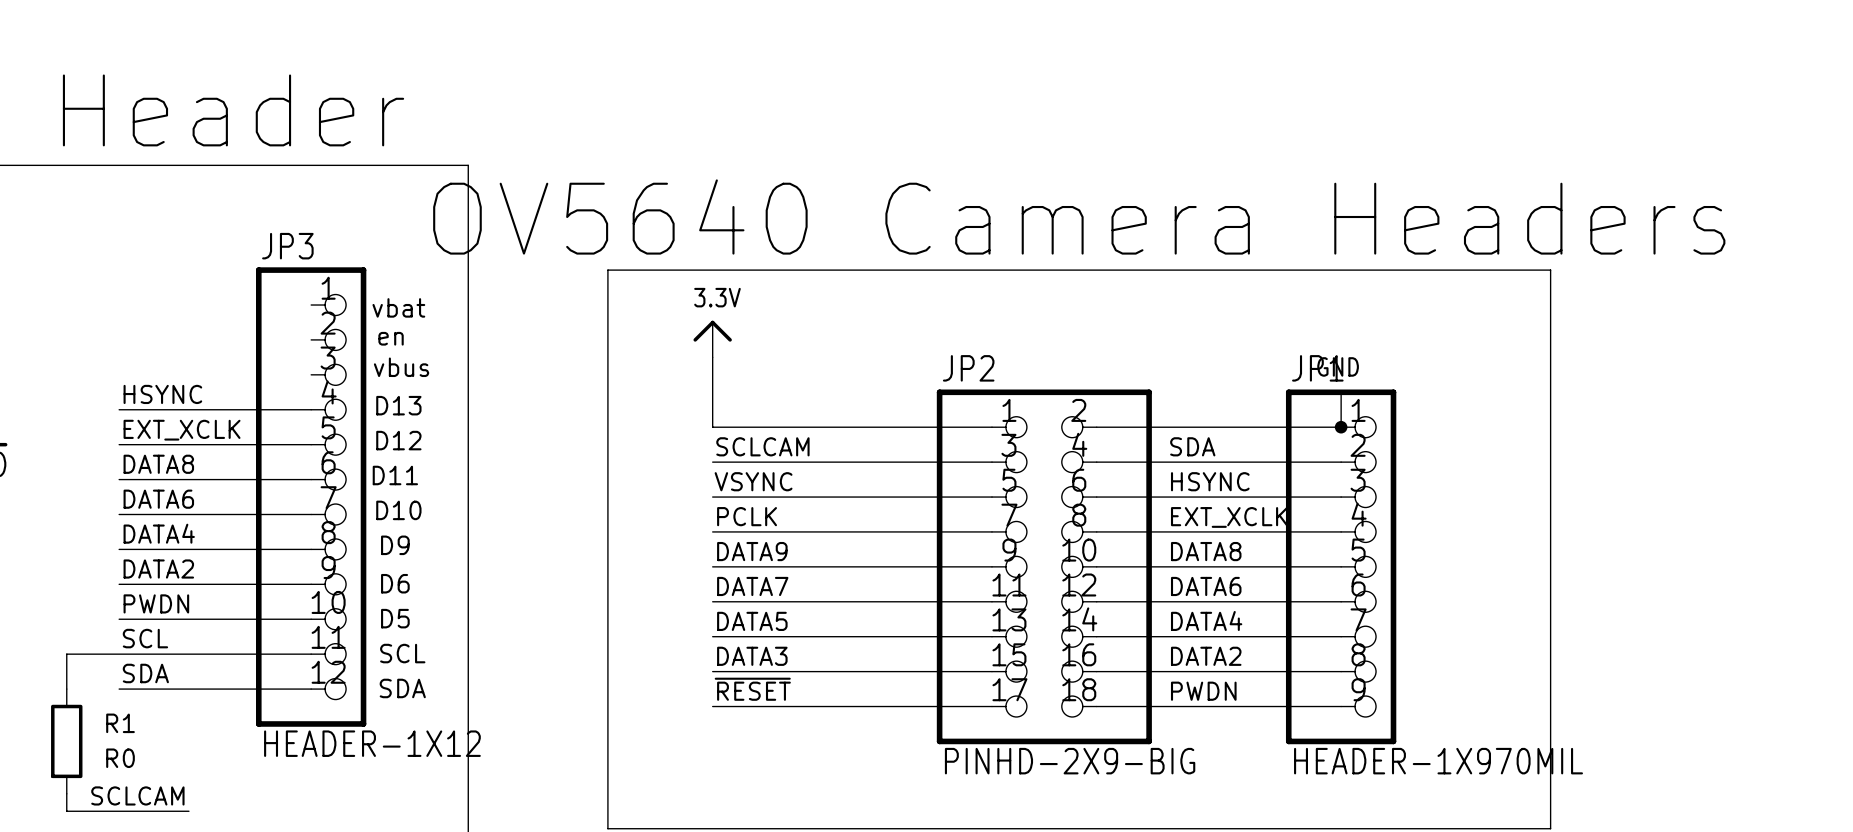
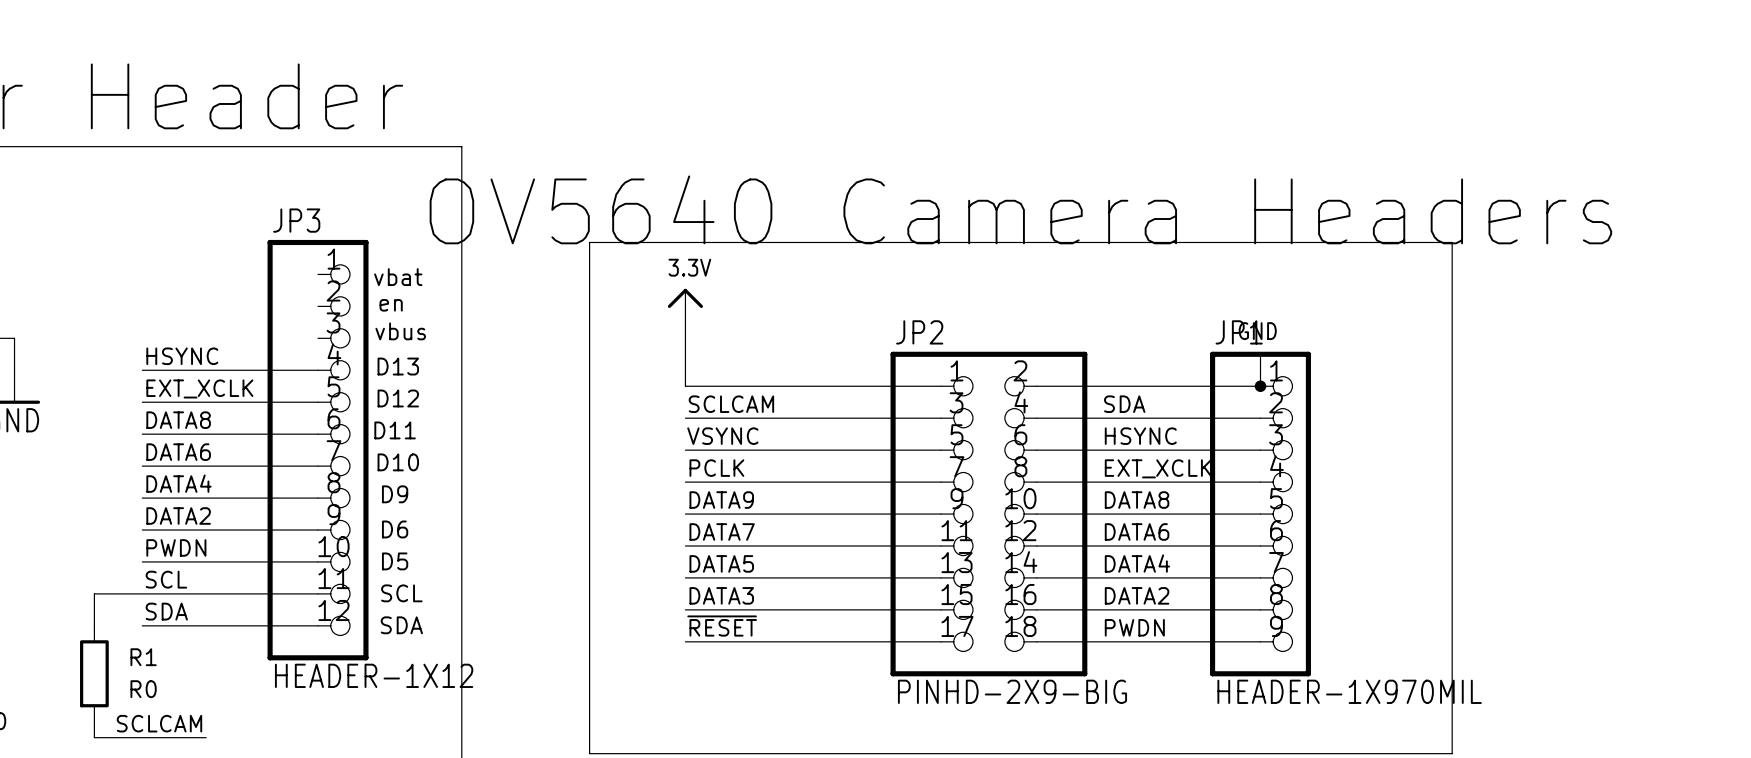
text position: OV5640 Camera Headers (1079, 217) -> OV5640 Camera Headers (1020, 209)

